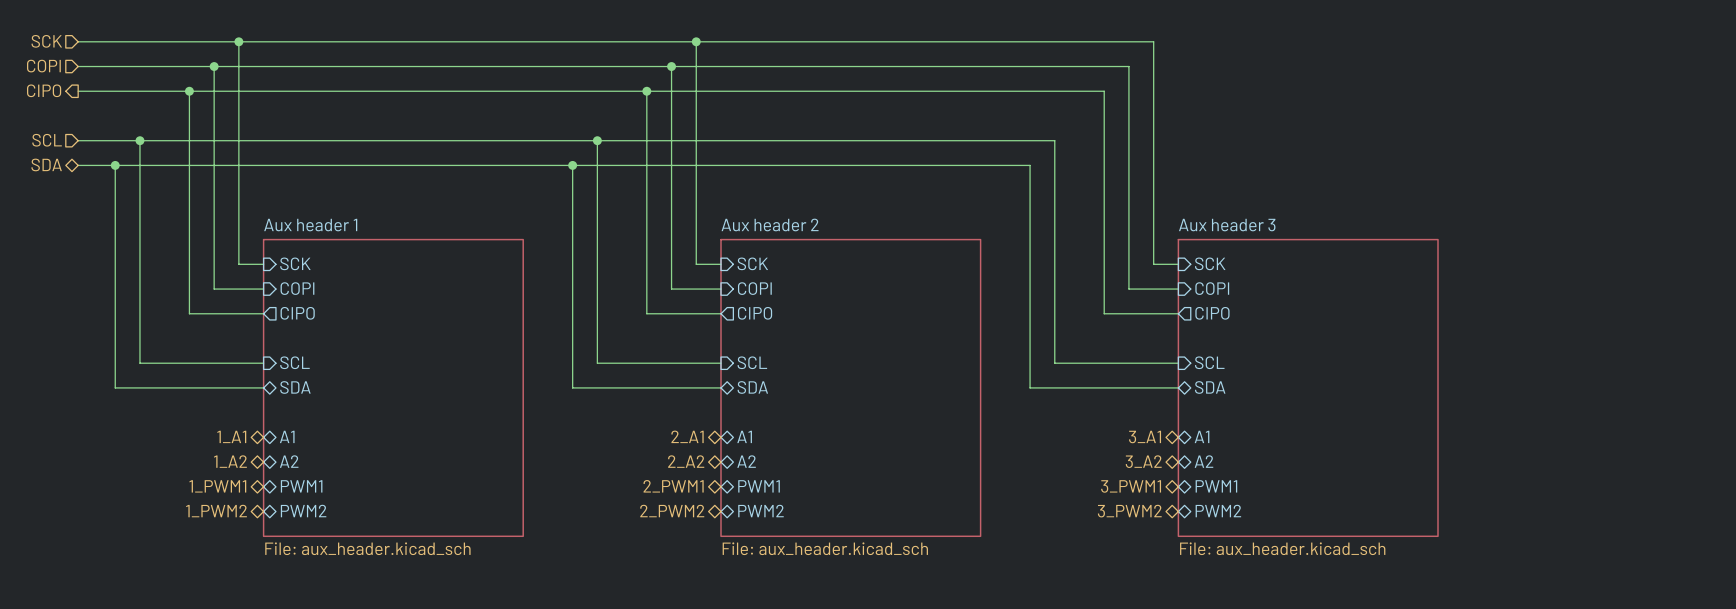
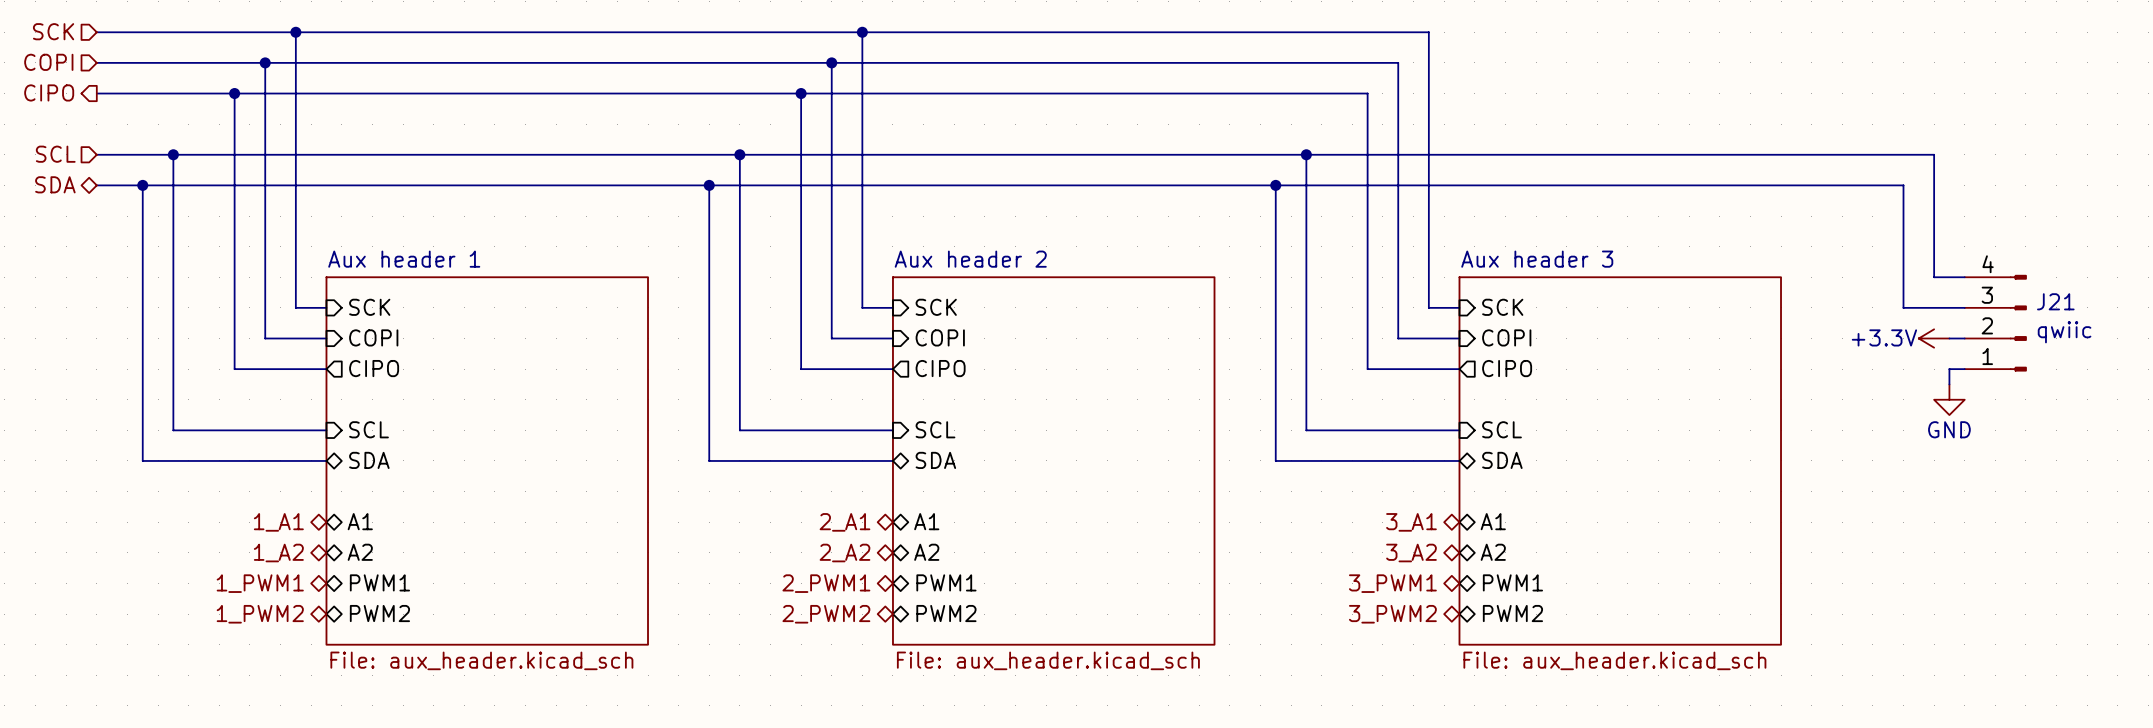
wire: none -> (1306, 154) (1934, 154) (1934, 277) (1964, 277)
junction: none -> (1306, 154)
wire: none -> (1275, 185) (1903, 185) (1903, 307) (1964, 307)
junction: none -> (1275, 185)
J21: none -> qwiic (1995, 323)
power symbol: none -> +3.3V (1934, 338)
wire: none -> (1949, 338) (1964, 338)
wire: none -> (1964, 369) (1949, 369) (1949, 384)
power symbol: none -> GND (1949, 399)

